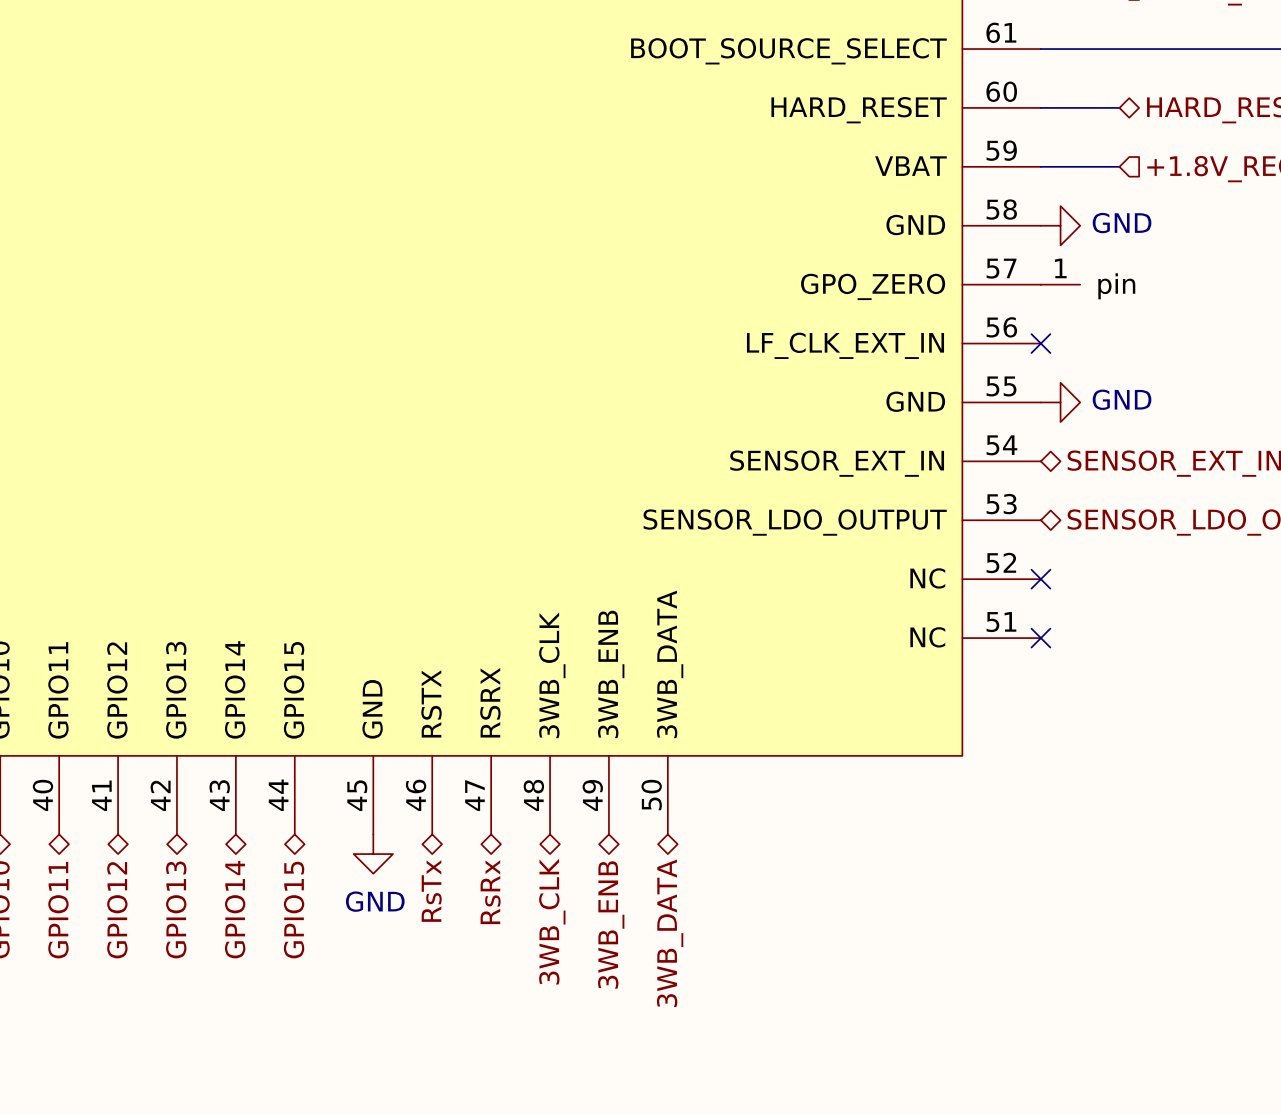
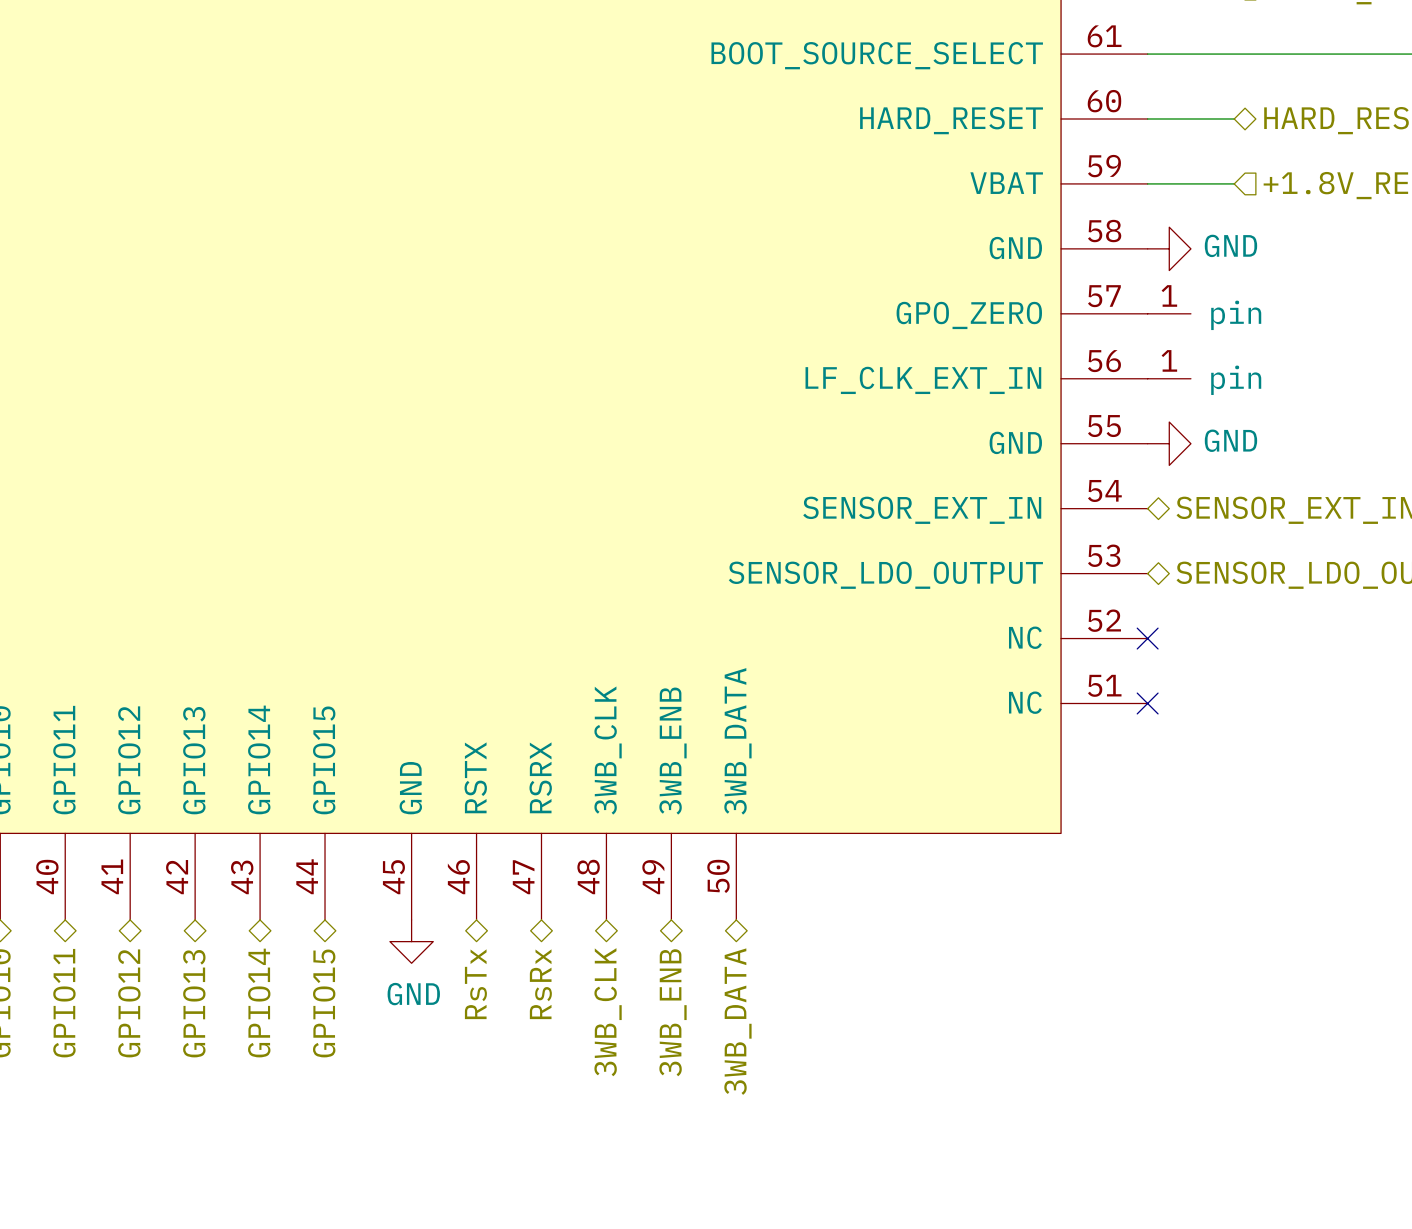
no-connect mark: (1040, 343) -> none
part: none -> (1169, 378)

